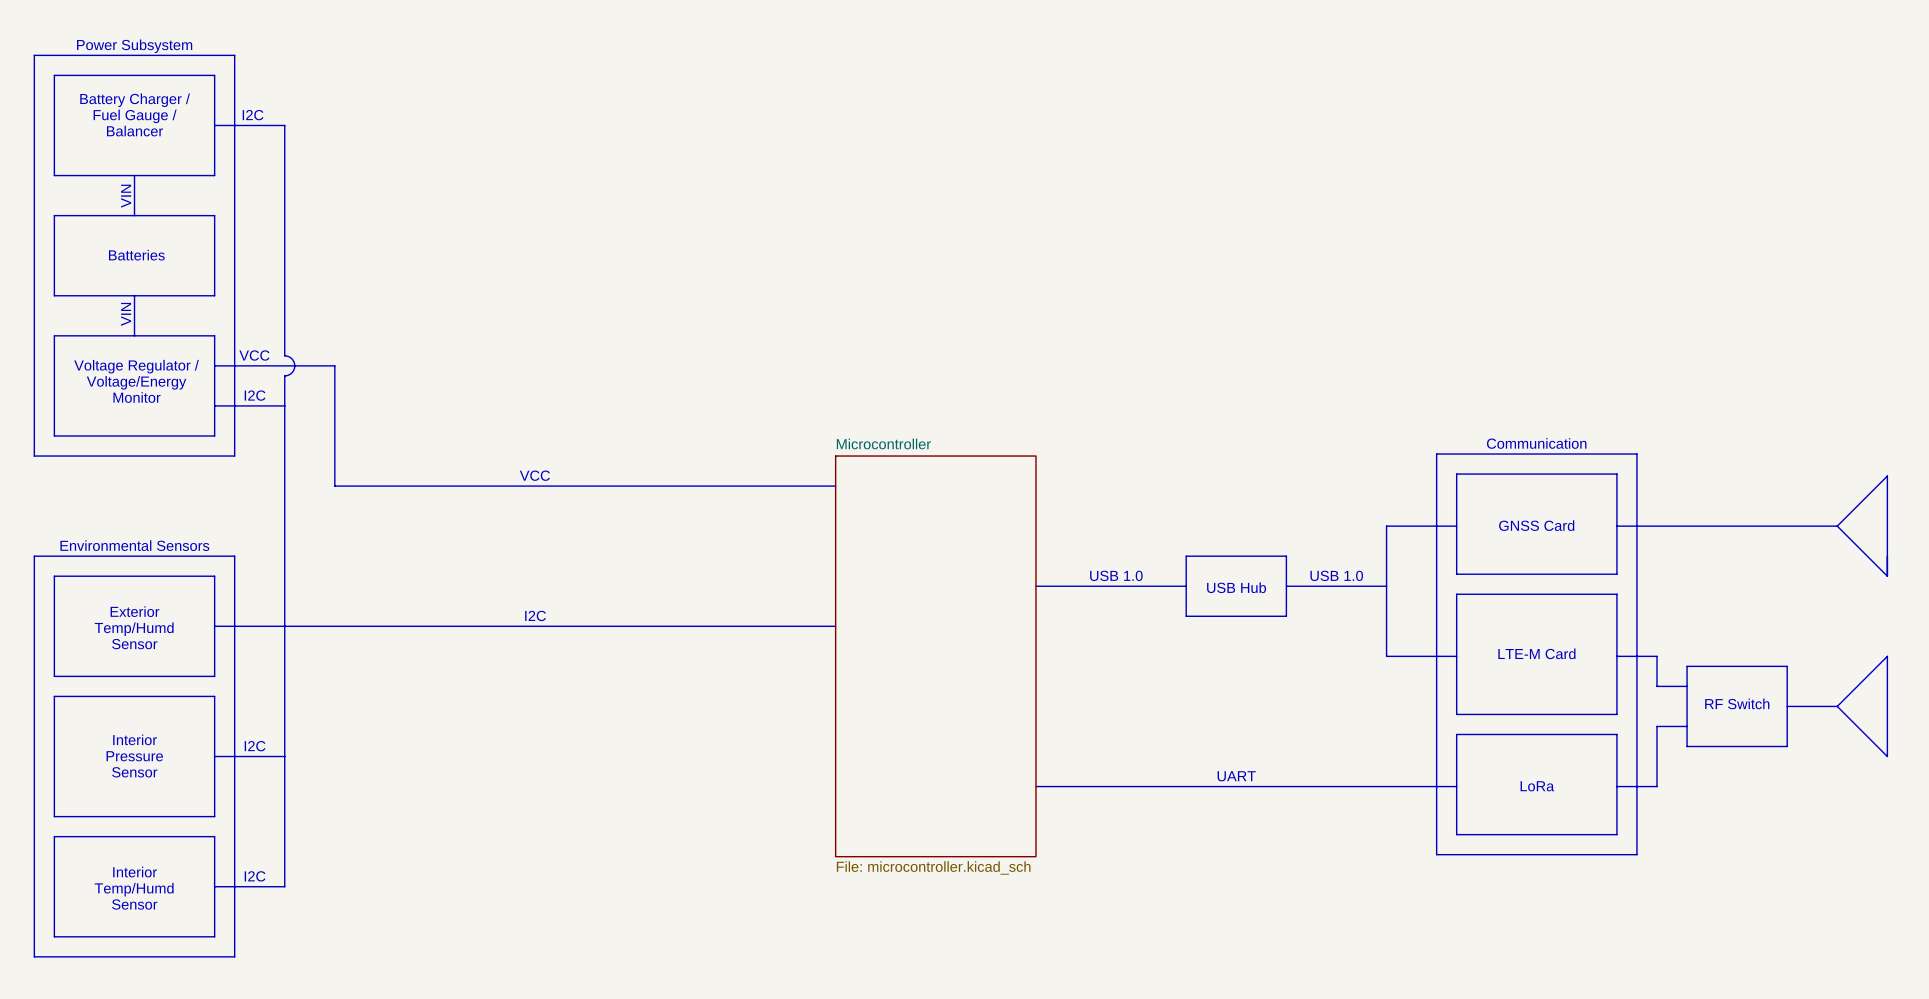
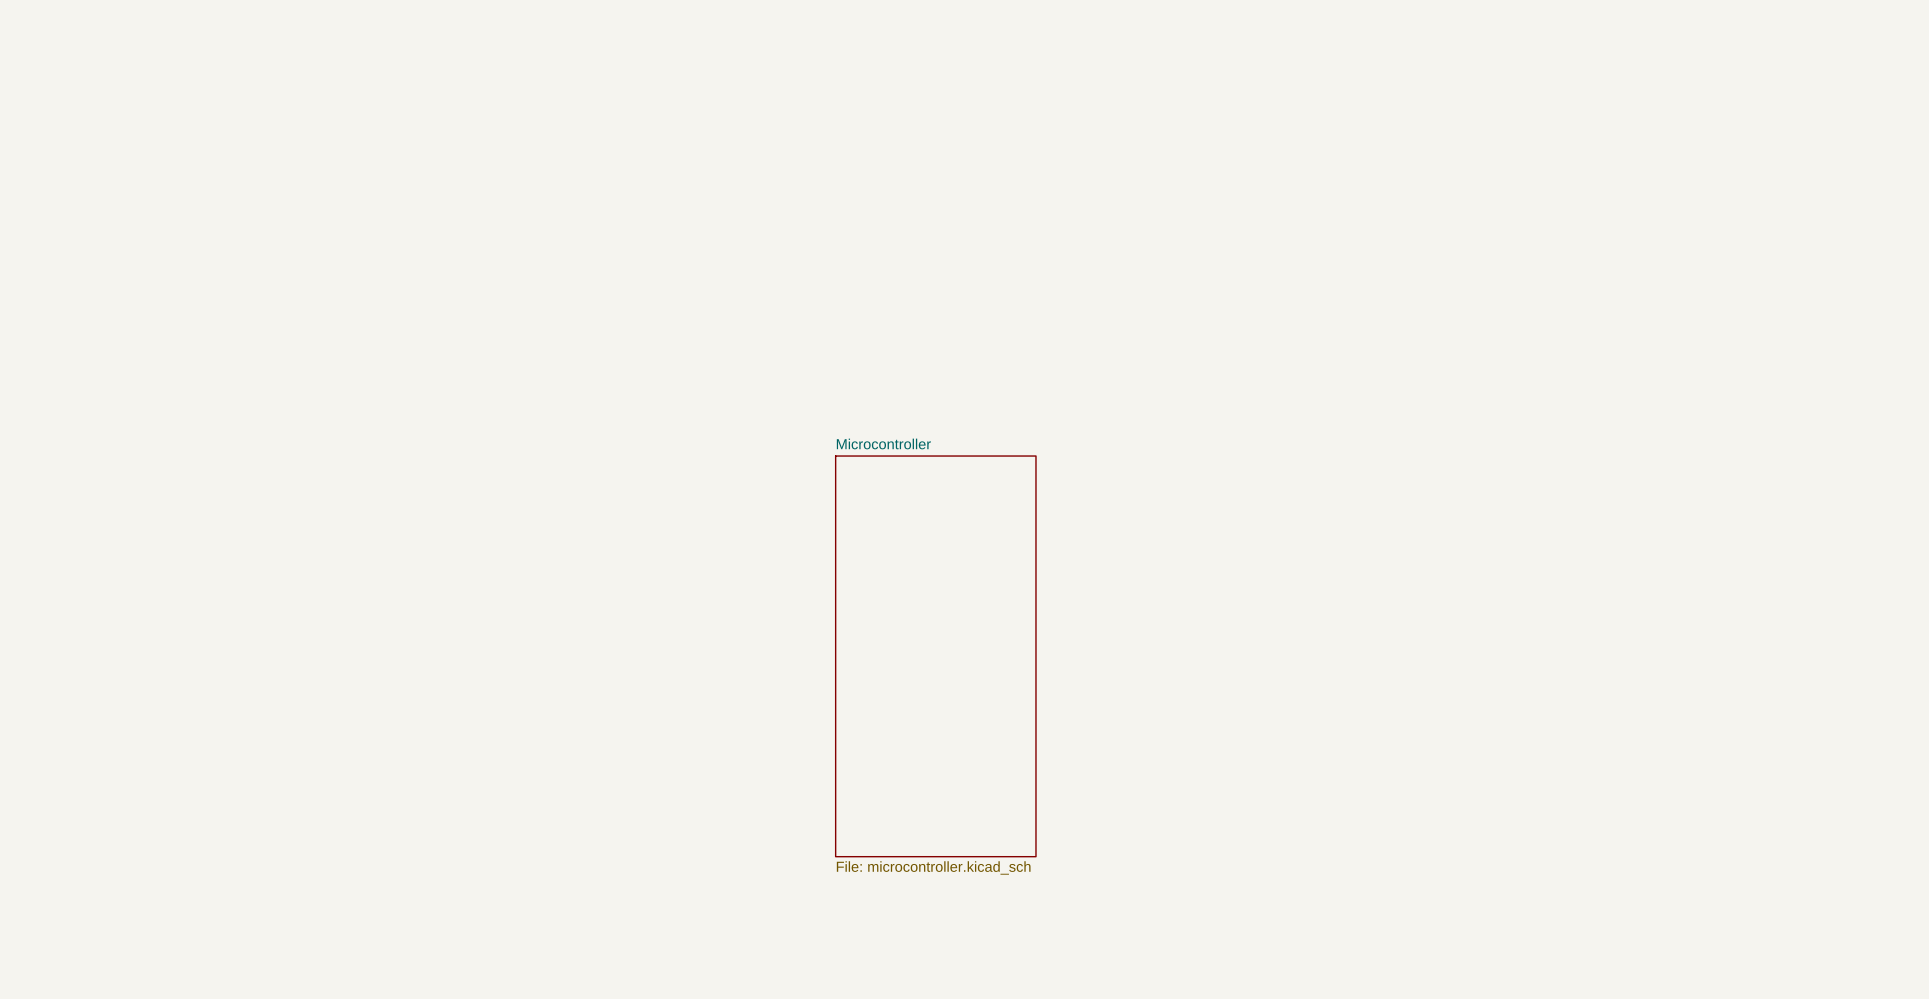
text: Power Subsystem (134, 46) -> none
line: (34, 55) (34, 456) (234, 456) (234, 55) (34, 55) -> none
line: (54, 75) (54, 175) (214, 175) (214, 75) (54, 75) -> none
text: Battery Charger / (135, 100) -> none
text: I2C (253, 115) -> none
text: Fuel Gauge / (135, 116) -> none
line: (214, 125) (284, 125) (284, 355) (291, 358) (294, 365) (291, 372) (284, 375) (284, 886) (214, 886) -> none
text: Balancer (134, 131) -> none
line: (134, 175) (134, 215) -> none
text: VIN (126, 196) -> none
line: (54, 215) (54, 295) (214, 295) (214, 215) (54, 215) -> none
text: Batteries (136, 255) -> none
line: (134, 295) (134, 335) -> none
text: VIN (126, 314) -> none
line: (54, 335) (54, 435) (214, 435) (214, 335) (54, 335) -> none
text: VCC (254, 355) -> none
line: (214, 365) (334, 365) (334, 486) (835, 486) -> none
text: Voltage Regulator / (136, 366) -> none
text: Voltage/Energy (136, 382) -> none
text: I2C (255, 395) -> none
text: Monitor (136, 397) -> none
line: (214, 405) (284, 405) -> none
text: Communication (1536, 443) -> none
line: (1436, 454) (1636, 454) (1636, 854) (1436, 854) (1436, 454) -> none
line: (1456, 474) (1616, 474) (1616, 574) (1456, 574) (1456, 474) -> none
text: VCC (534, 475) -> none
text: GNSS Card (1536, 525) -> none
line: (1456, 526) (1386, 526) (1386, 656) (1456, 656) -> none
line: (1616, 526) (1837, 526) -> none
line: (1837, 526) (1887, 476) (1887, 576) (1837, 526) -> none
text: Environmental Sensors (134, 545) -> none
line: (34, 556) (234, 556) (234, 956) (34, 956) (34, 556) -> none
line: (1186, 556) (1286, 556) (1286, 616) (1186, 616) (1186, 556) -> none
text: USB 1.0 (1116, 575) -> none
text: USB 1.0 (1336, 575) -> none
line: (54, 576) (54, 676) (214, 676) (214, 576) (54, 576) -> none
line: (1035, 586) (1186, 586) -> none
line: (1286, 586) (1386, 586) -> none
text: USB Hub (1236, 587) -> none
line: (1456, 594) (1456, 714) (1616, 714) (1616, 594) (1456, 594) -> none
text: Exterior (134, 611) -> none
text: I2C (535, 615) -> none
line: (214, 626) (835, 626) -> none
text: Temp/Humd (134, 629) -> none
text: Sensor (134, 644) -> none
text: LTE-M Card (1536, 653) -> none
line: (1616, 656) (1657, 656) (1657, 686) (1687, 686) -> none
line: (1687, 666) (1787, 666) (1787, 746) (1687, 746) (1687, 666) -> none
line: (54, 696) (54, 816) (214, 816) (214, 696) (54, 696) -> none
text: RF Switch (1737, 703) -> none
line: (1787, 706) (1837, 706) -> none
line: (1837, 706) (1887, 656) (1887, 756) (1837, 706) -> none
line: (1687, 726) (1657, 726) (1657, 786) (1616, 786) -> none
line: (1456, 734) (1456, 834) (1616, 834) (1616, 734) (1456, 734) -> none
text: Interior (135, 739) -> none
text: I2C (255, 746) -> none
text: Pressure (134, 756) -> none
line: (214, 756) (284, 756) -> none
text: Sensor (134, 772) -> none
text: UART (1236, 776) -> none
line: (1035, 786) (1456, 786) -> none
text: LoRa (1537, 786) -> none
line: (54, 836) (214, 836) (214, 936) (54, 936) (54, 836) -> none
text: Interior (135, 872) -> none
text: I2C (255, 876) -> none
text: Temp/Humd (134, 889) -> none
text: Sensor (134, 904) -> none

